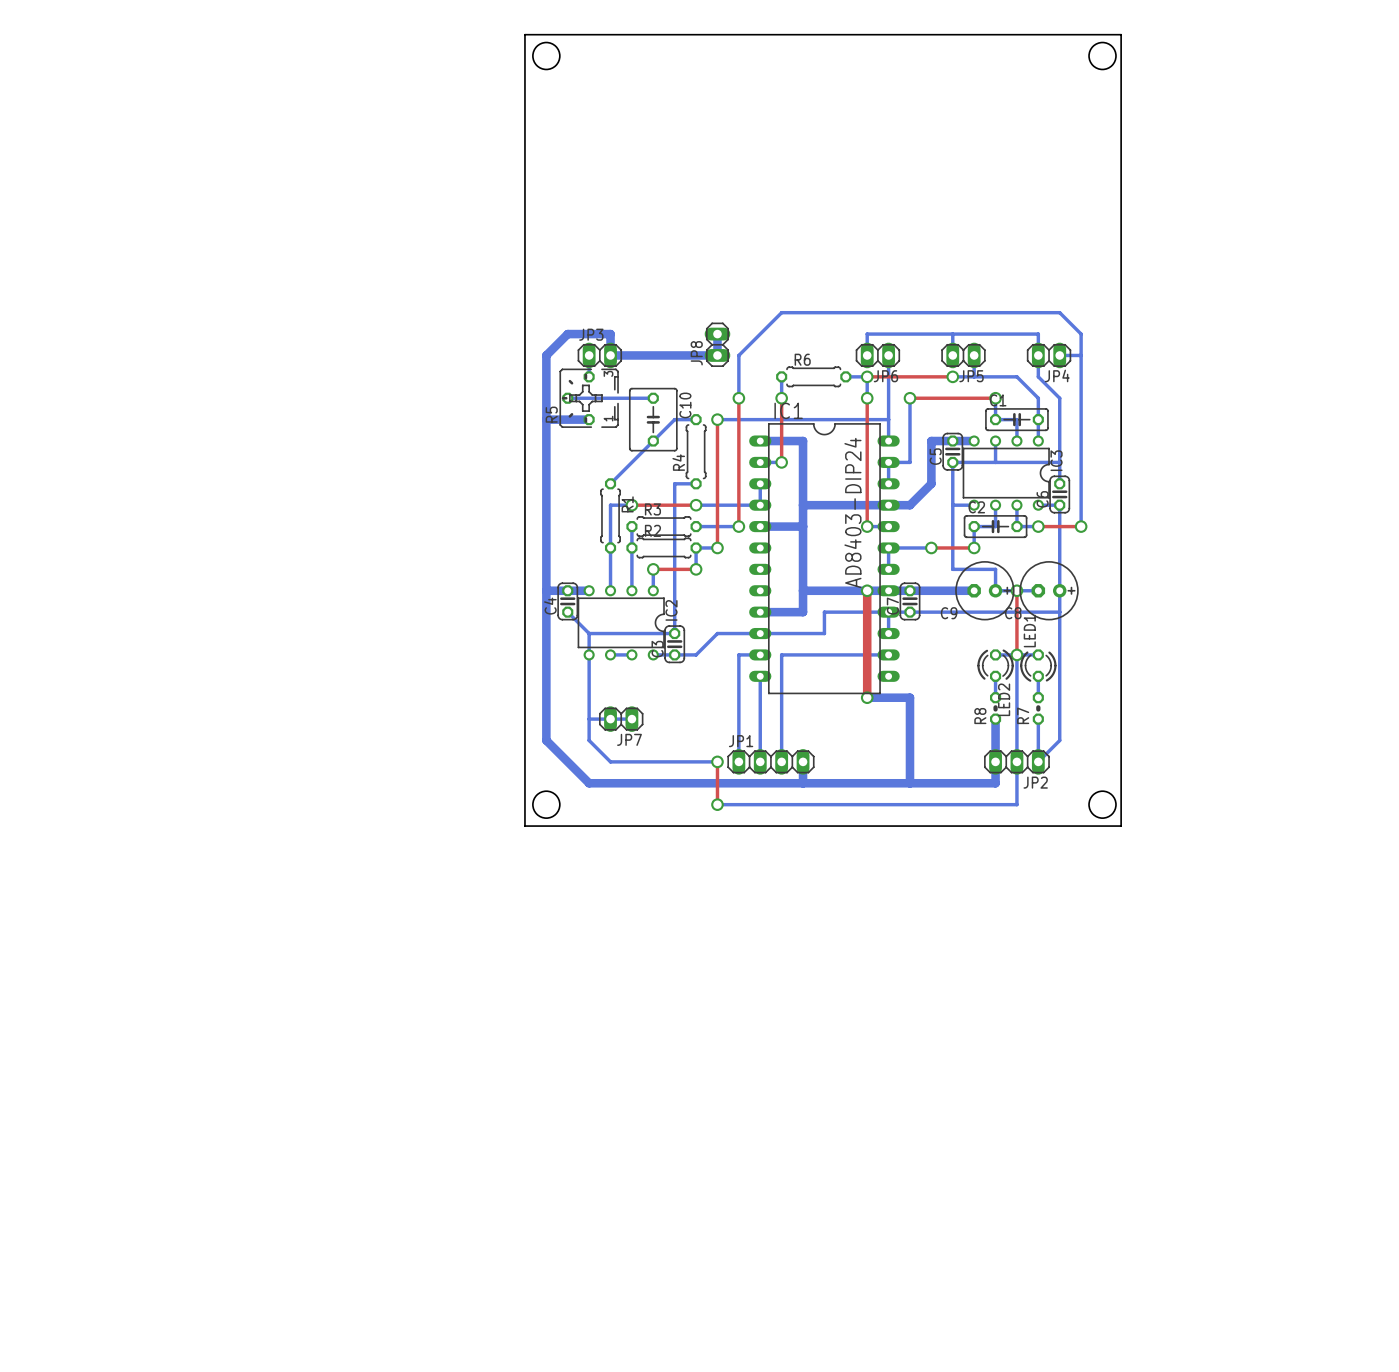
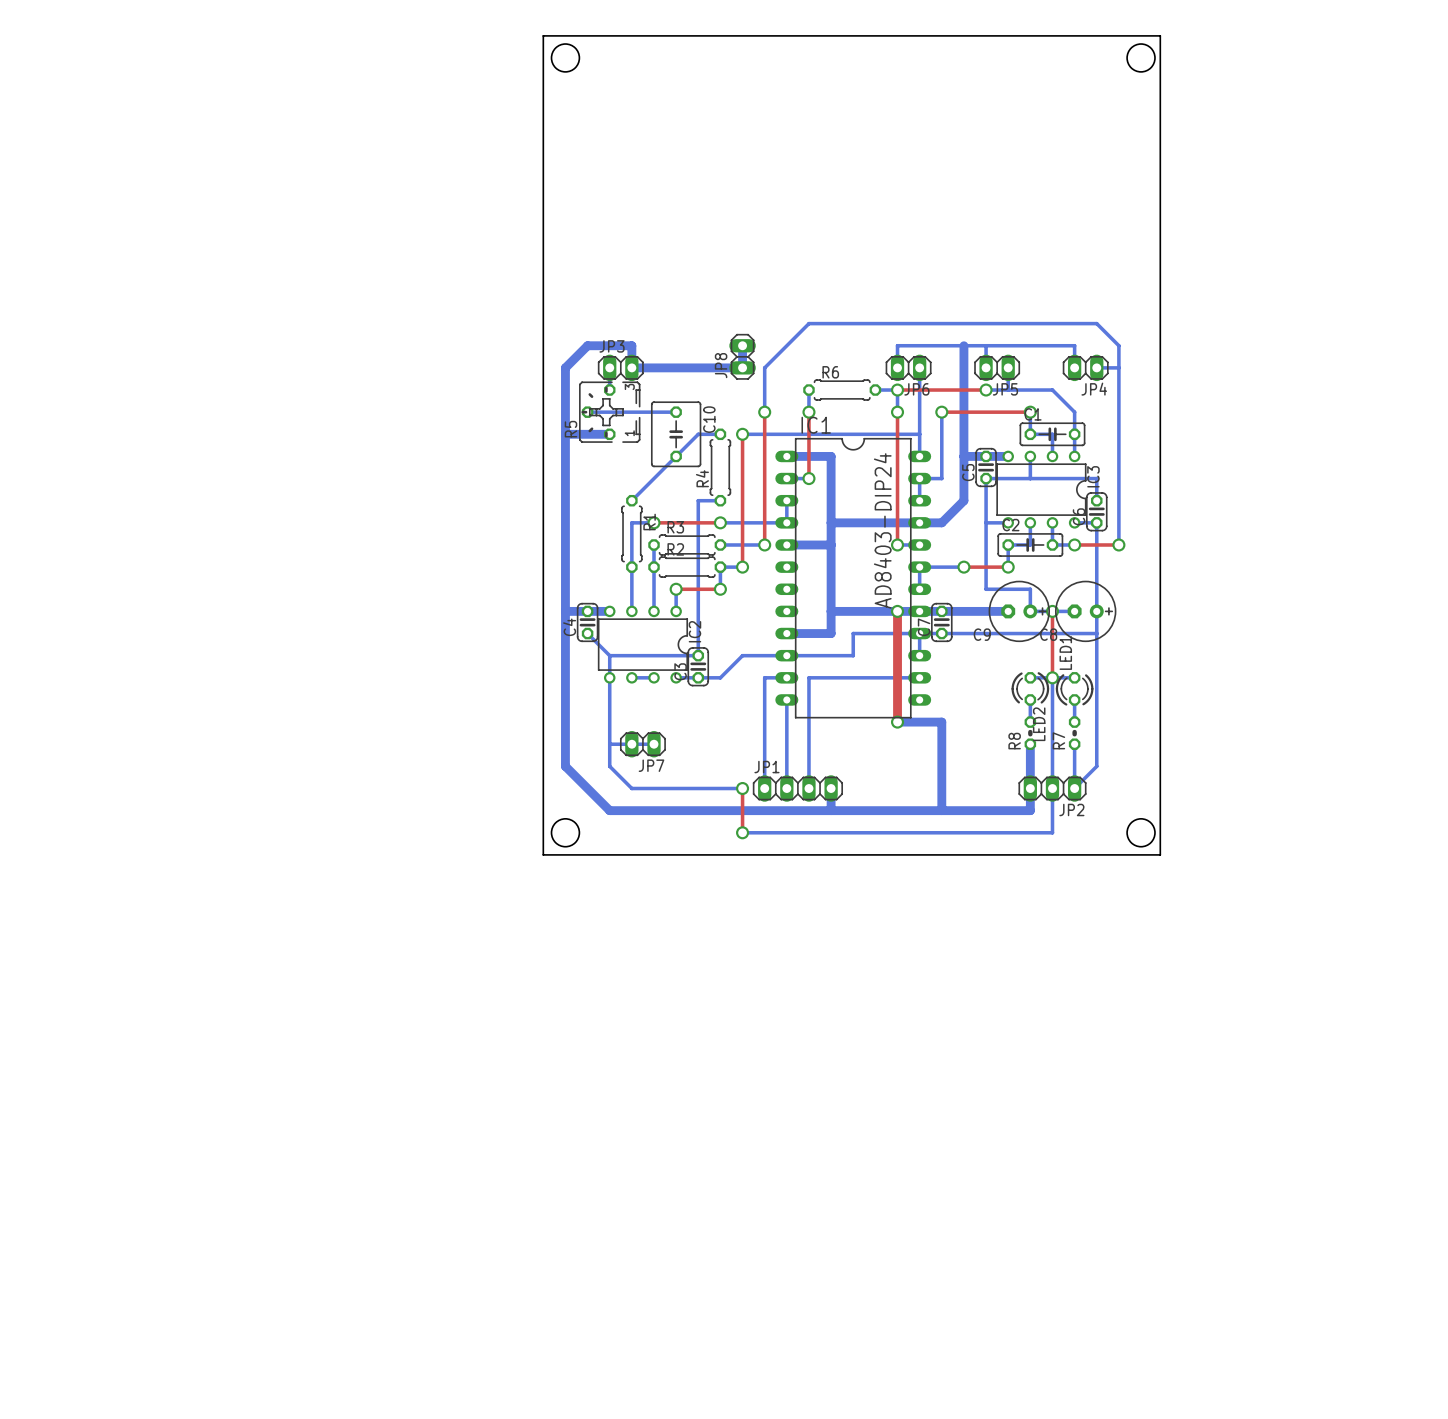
bottom track: none -> (963, 345) (963, 456)
bottom track: (1038, 355) (1038, 376) (1059, 398) (1059, 462) -> none

